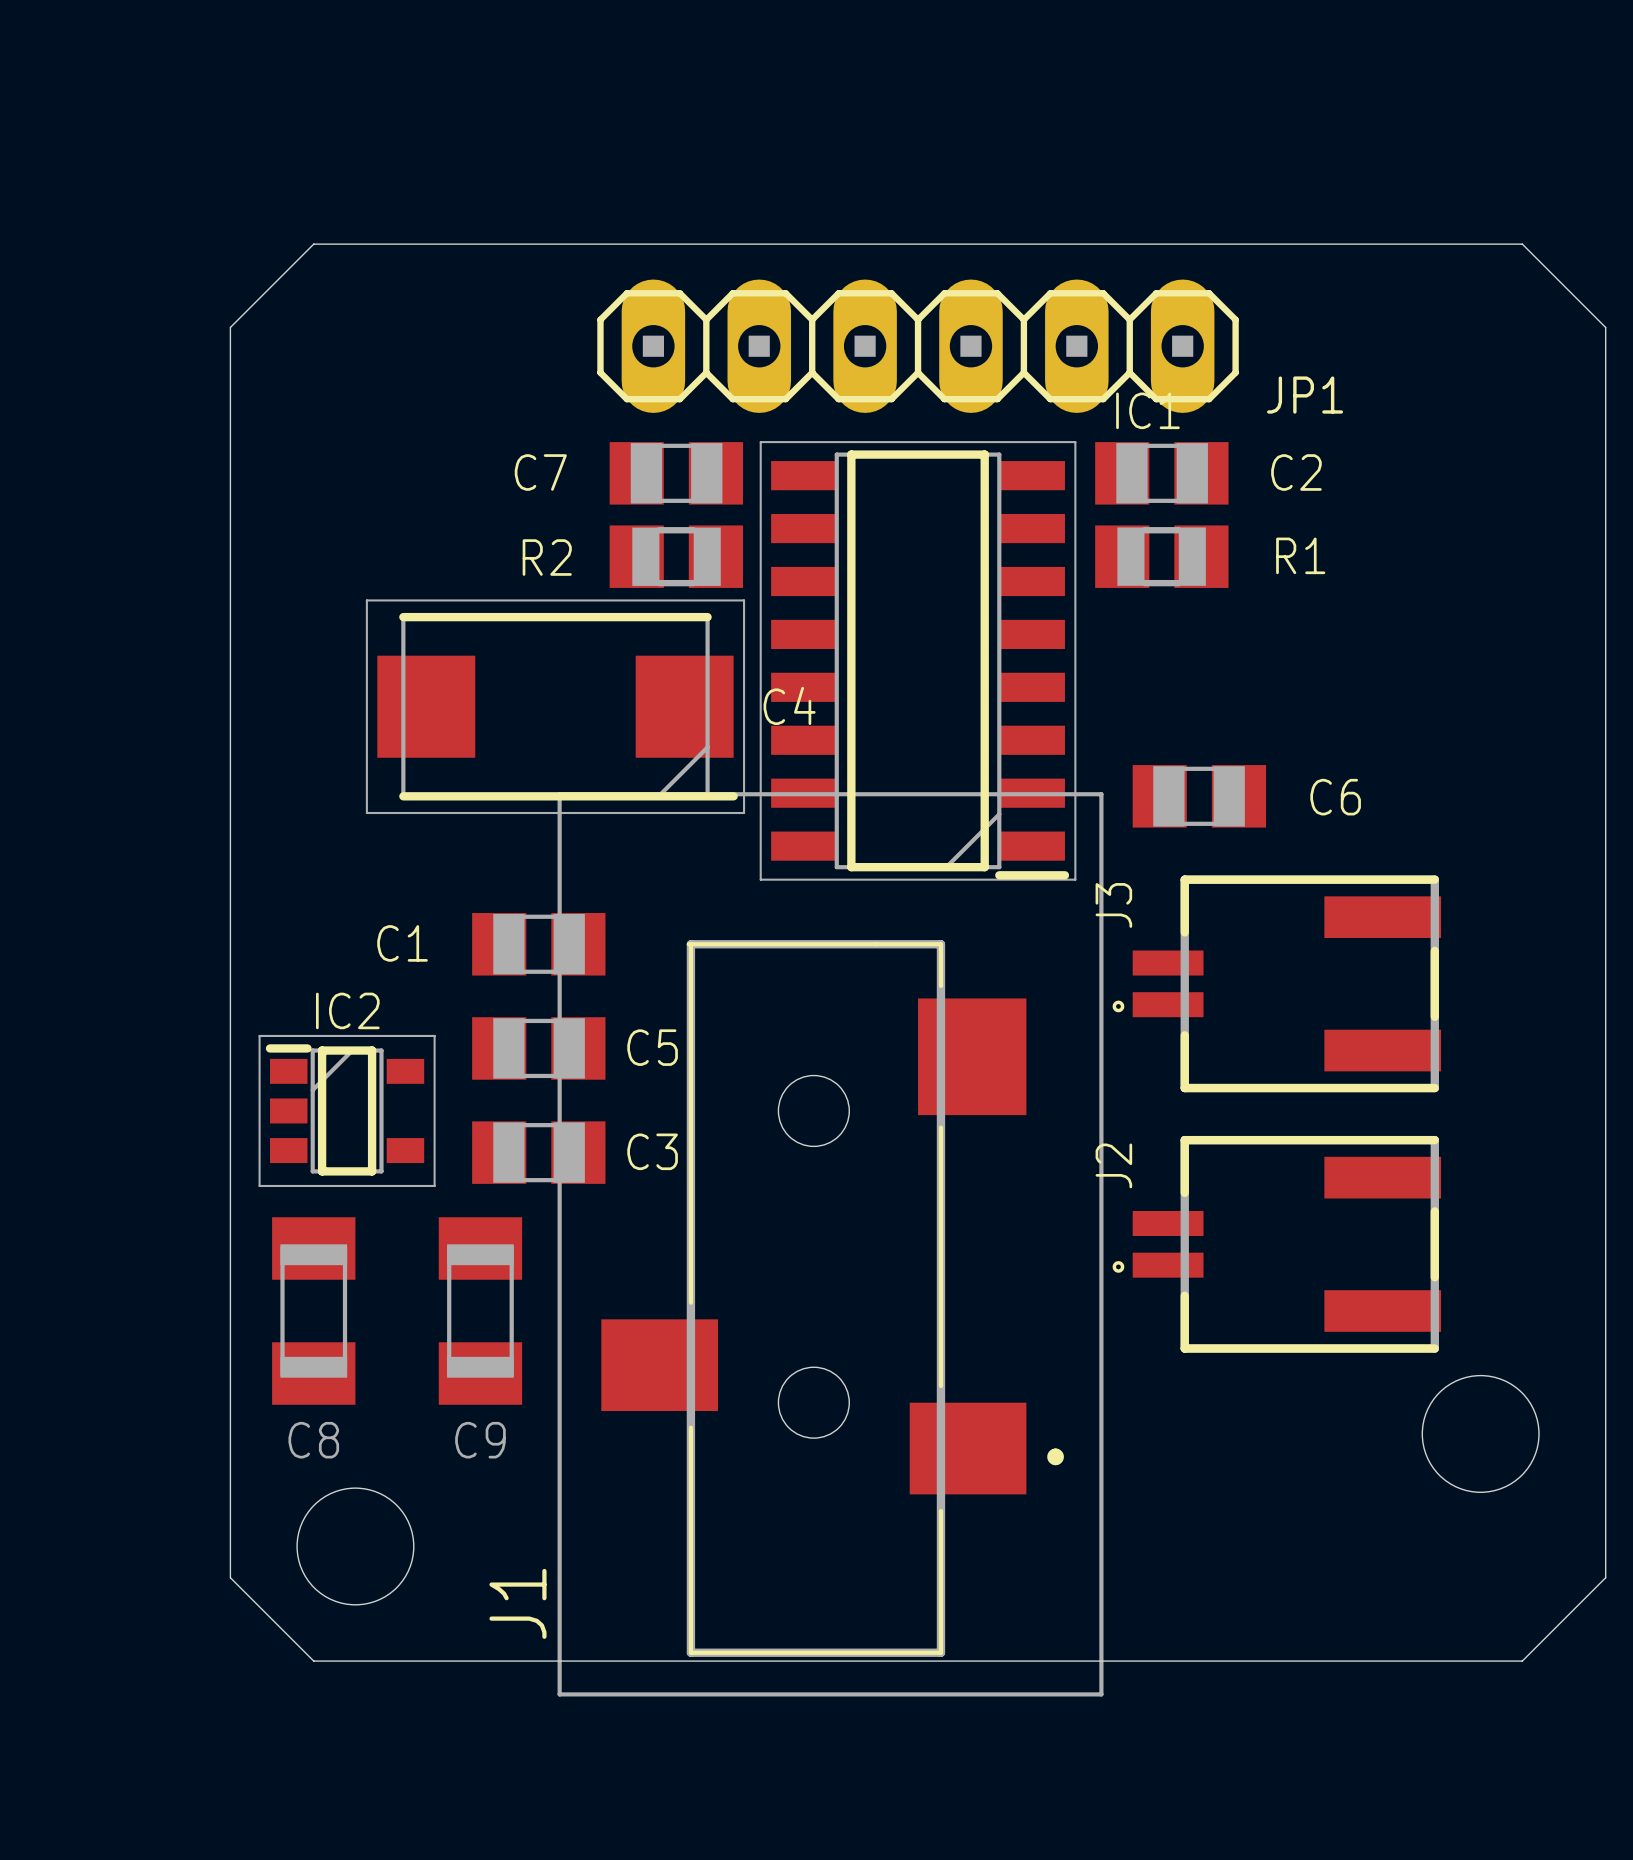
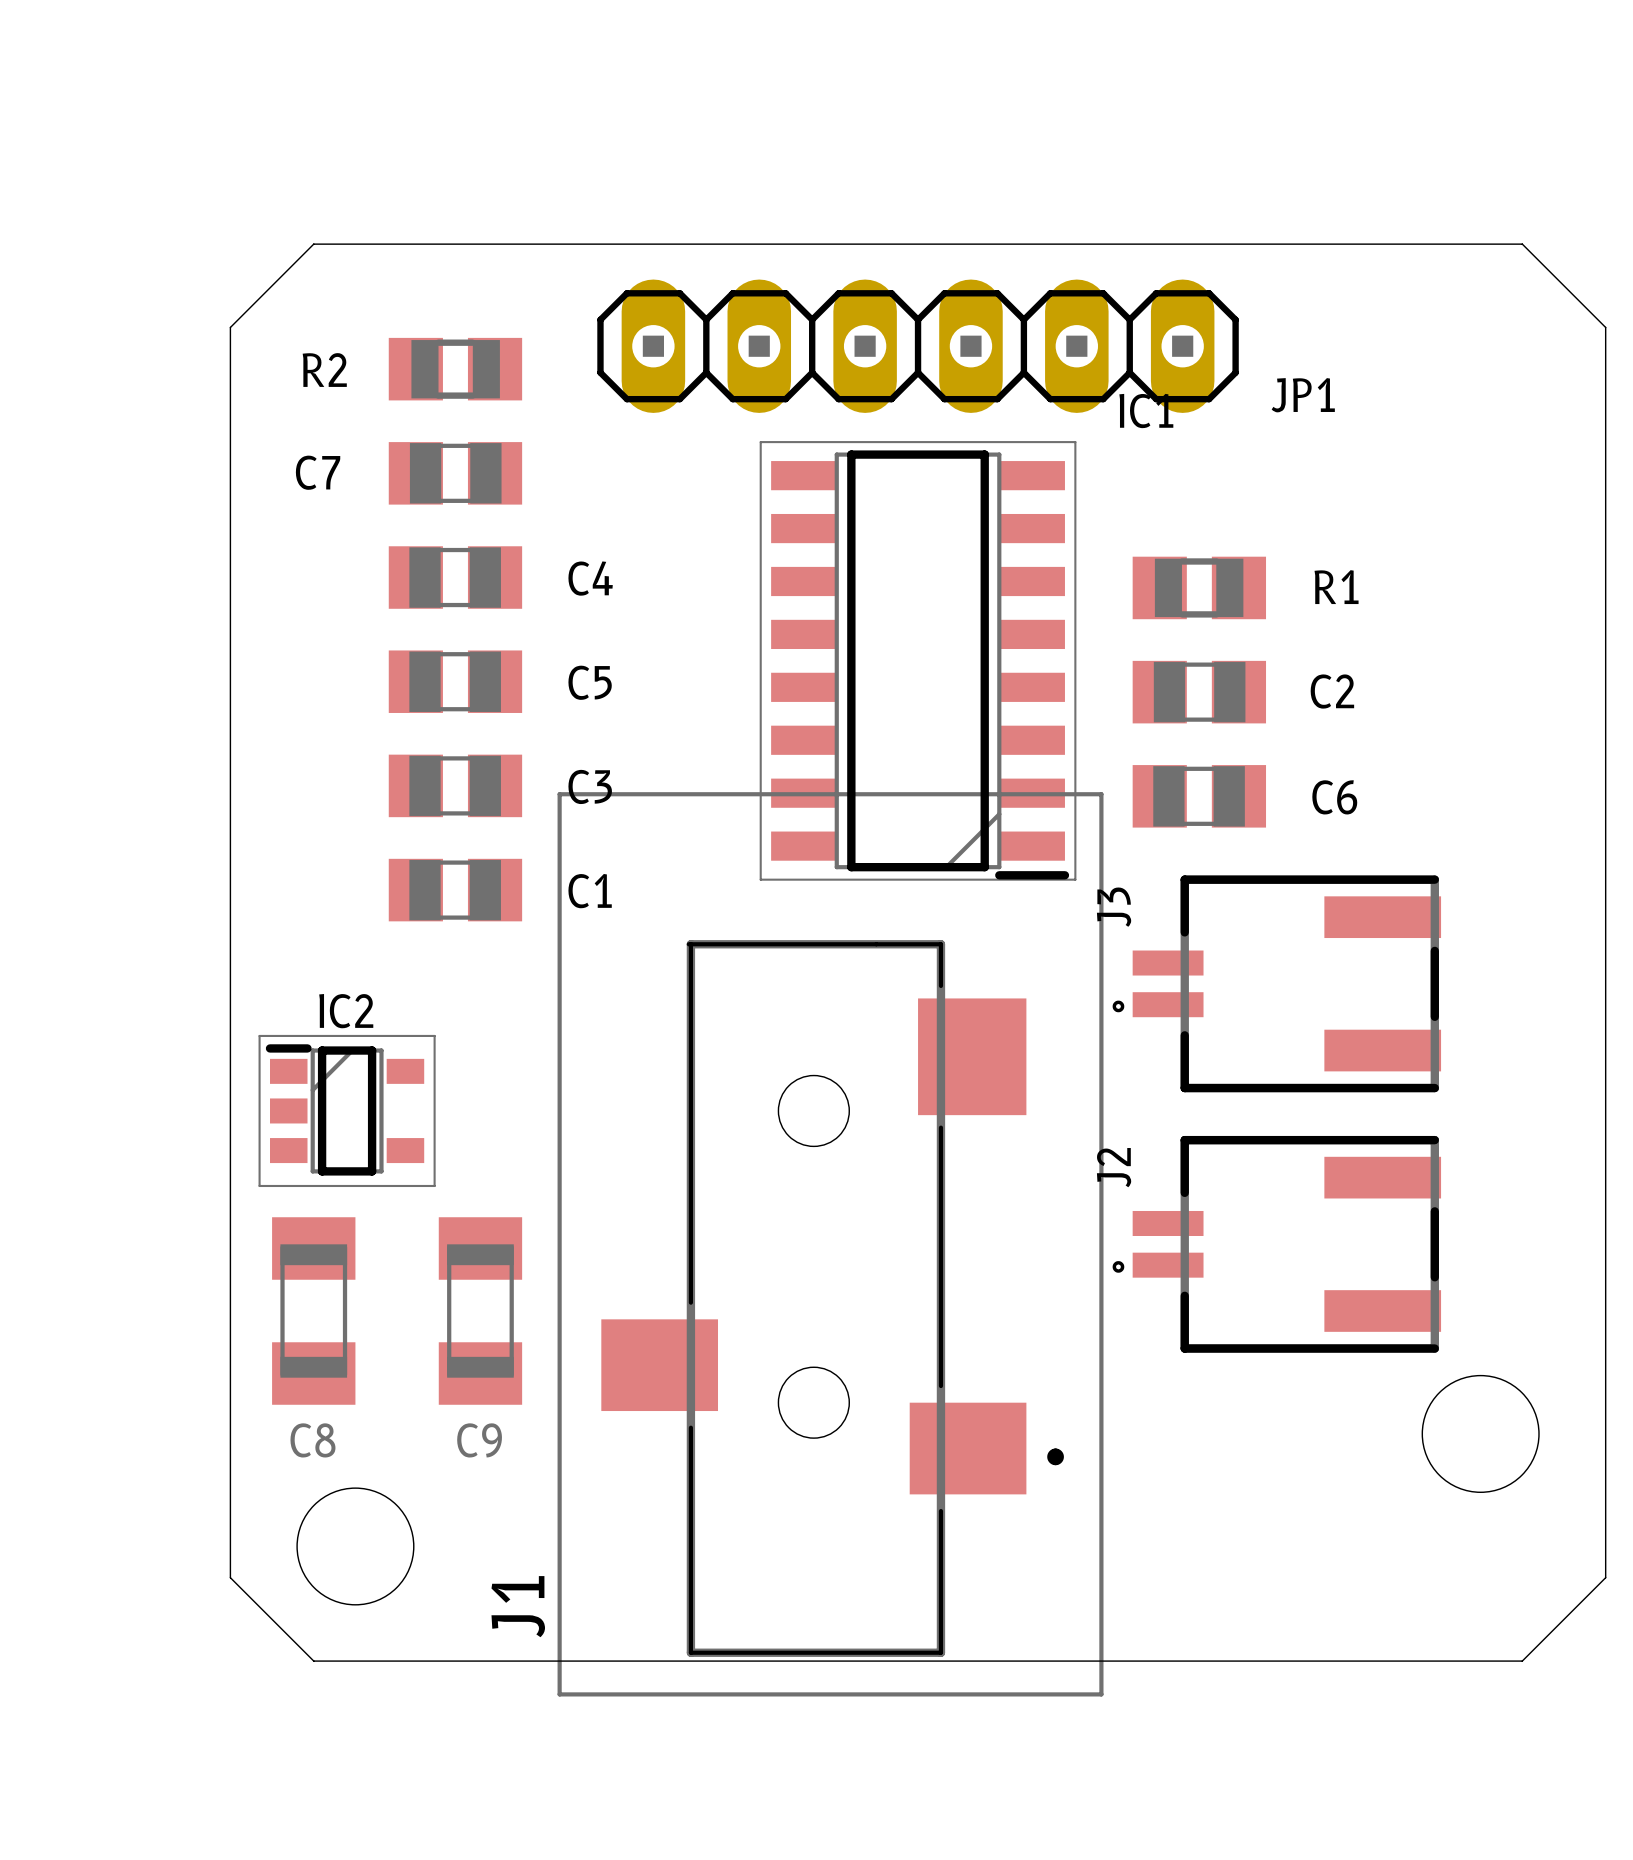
C7 position: (676, 473) -> (455, 473)
C2 position: (1161, 473) -> (1199, 692)
R2 position: (676, 556) -> (455, 369)
R1 position: (1161, 556) -> (1199, 587)
C4 footprint: [365, 599, 746, 815] -> [388, 546, 523, 609]
C4 name position: C4 (789, 705) -> C4 (590, 578)
C1 name position: C1 (402, 943) -> C1 (590, 891)
C1 position: (538, 944) -> (455, 890)
C5 name position: C5 (652, 1047) -> C5 (590, 682)
C5 position: (538, 1048) -> (455, 681)
C3 name position: C3 (652, 1151) -> C3 (590, 786)
C3 position: (538, 1152) -> (455, 785)

